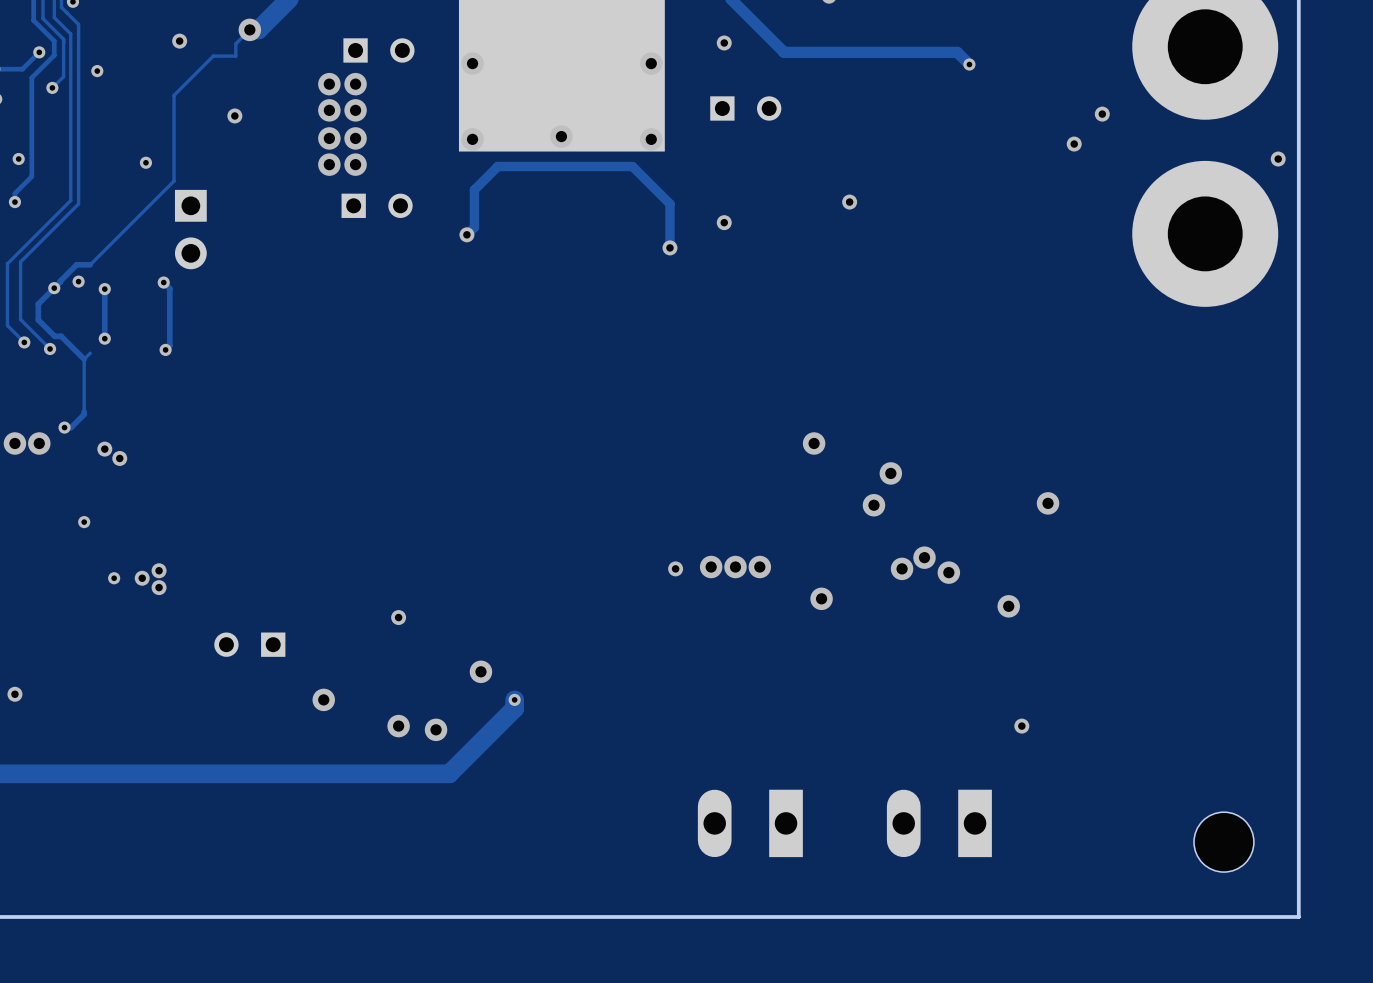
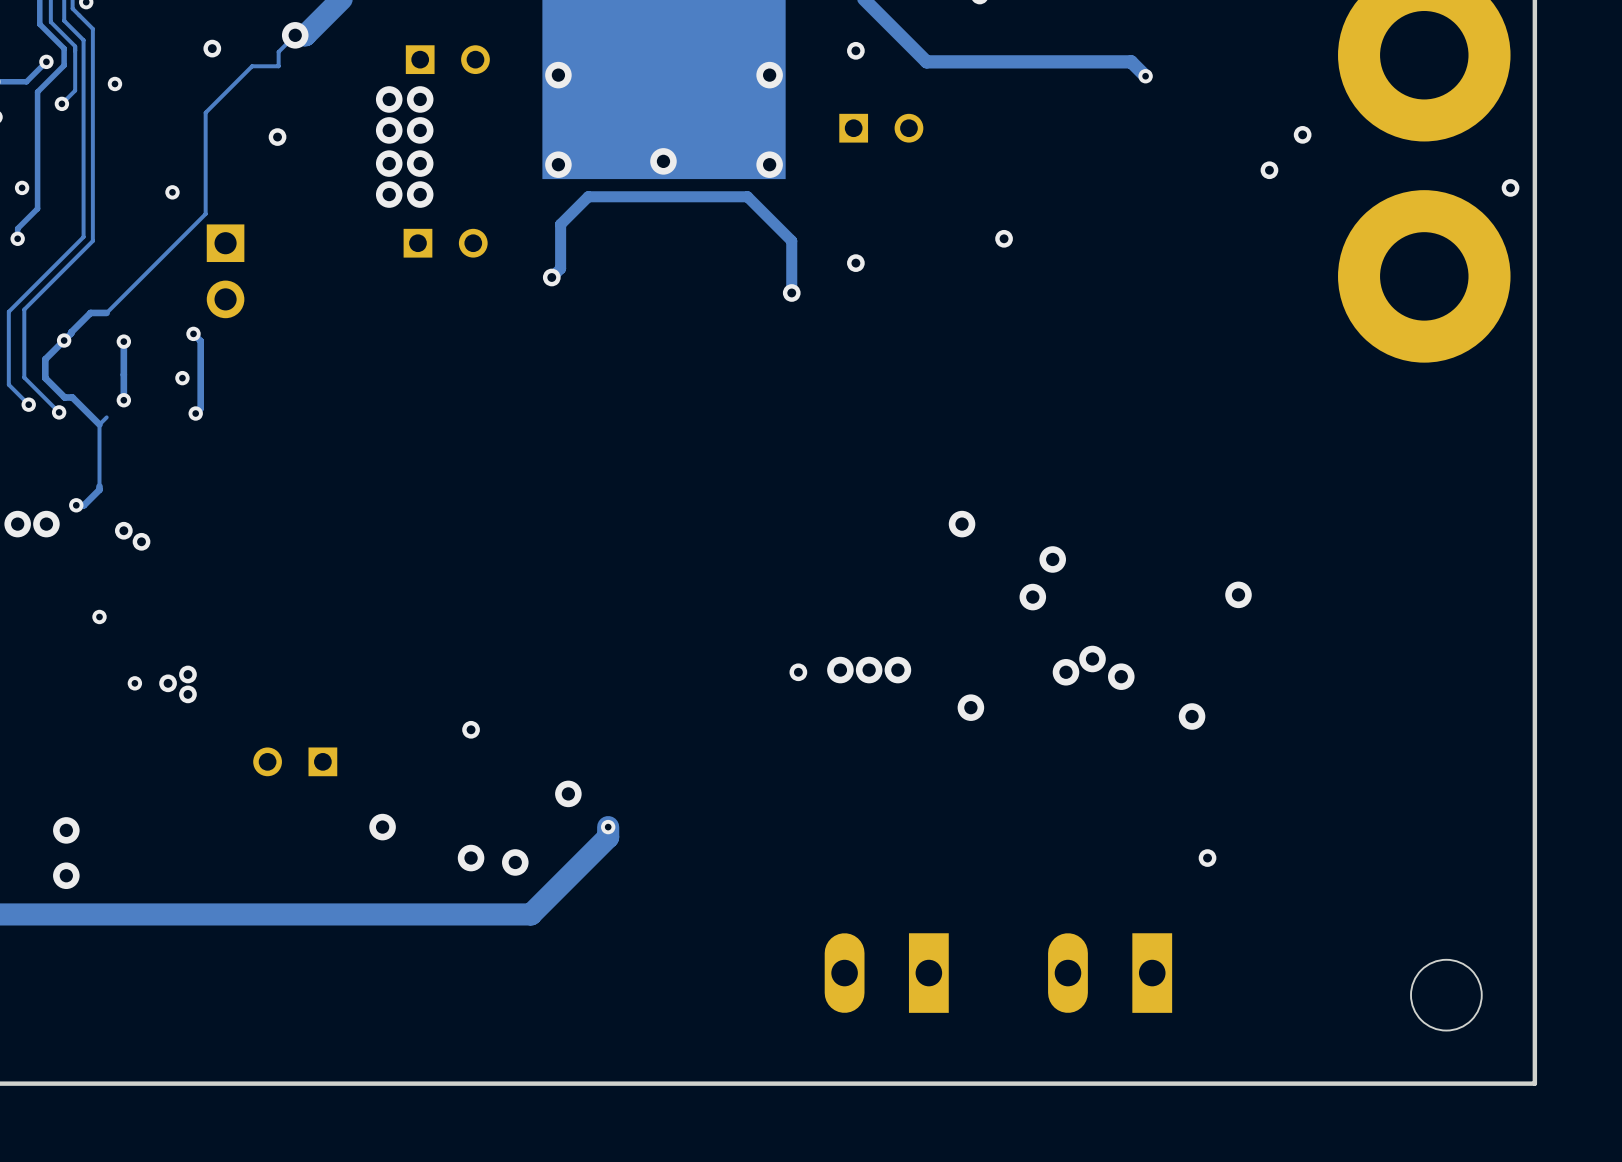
via position: (78, 281) -> (182, 378)
via: (14, 694) -> none
via: none -> (66, 830)
via: none -> (66, 875)

